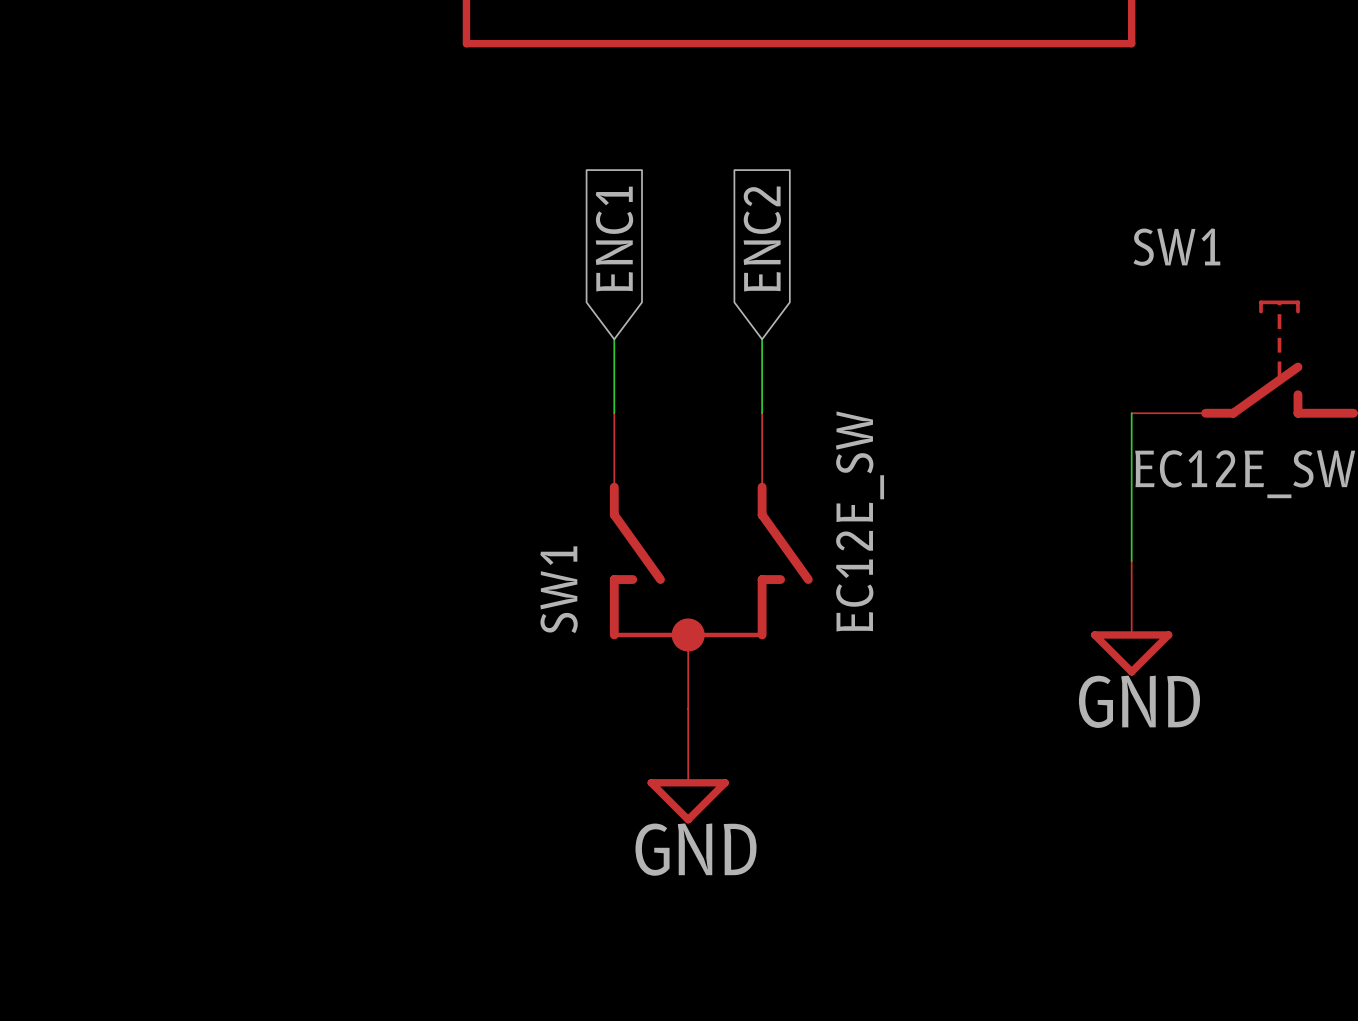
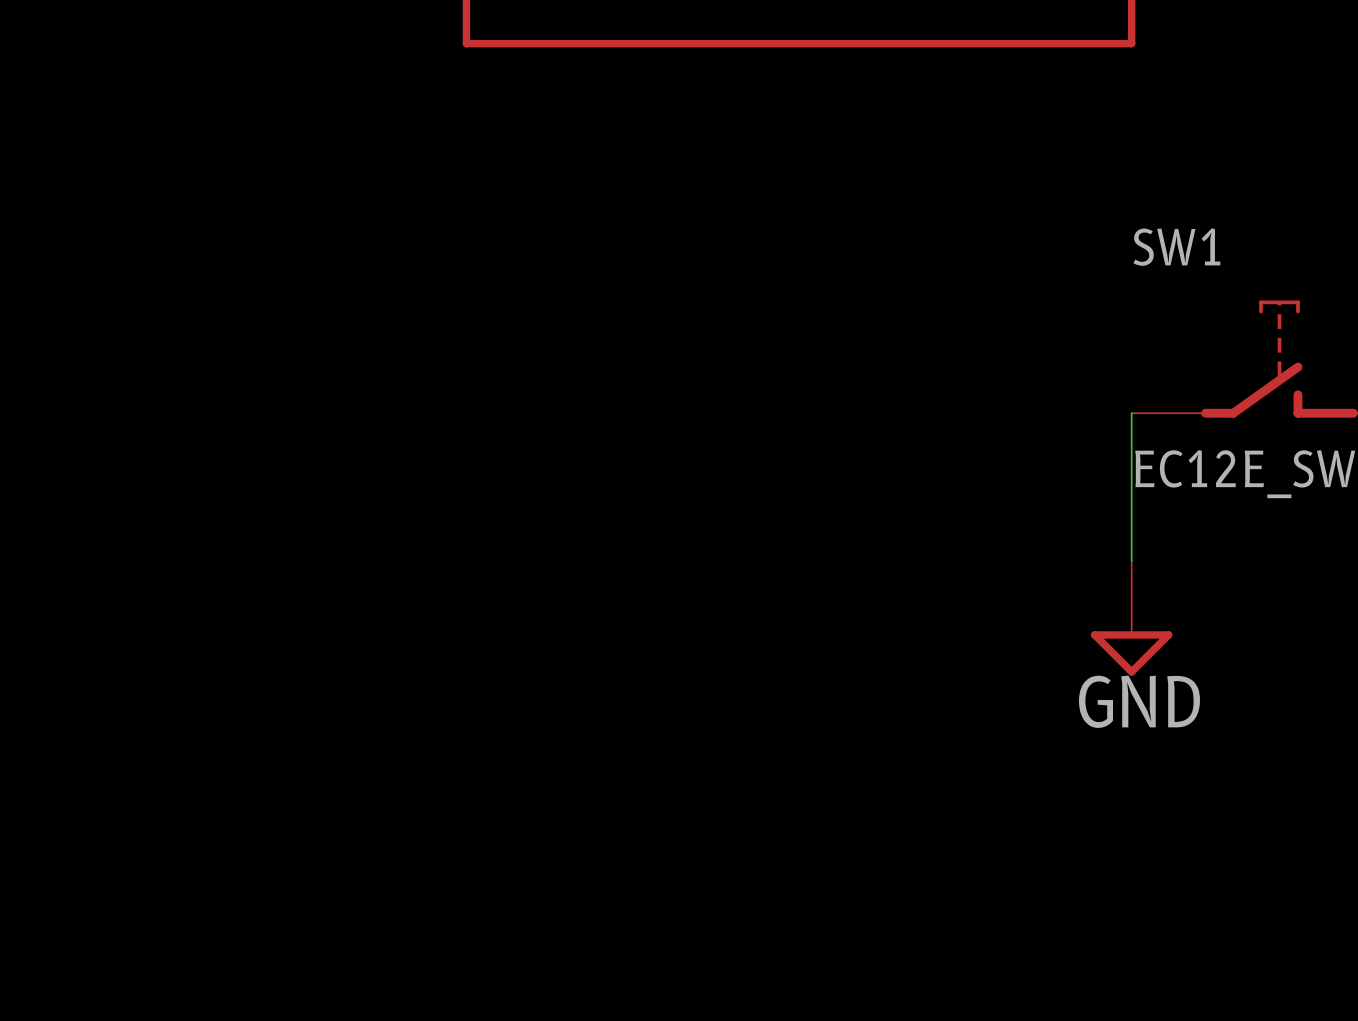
global label: ENC2 (762, 238) -> none
global label: ENC1 (614, 239) -> none
wire: (614, 339) (614, 413) -> none
wire: (762, 339) (762, 413) -> none
SW1: EC12E_SW (711, 561) -> none
power symbol: GND (688, 766) -> none

